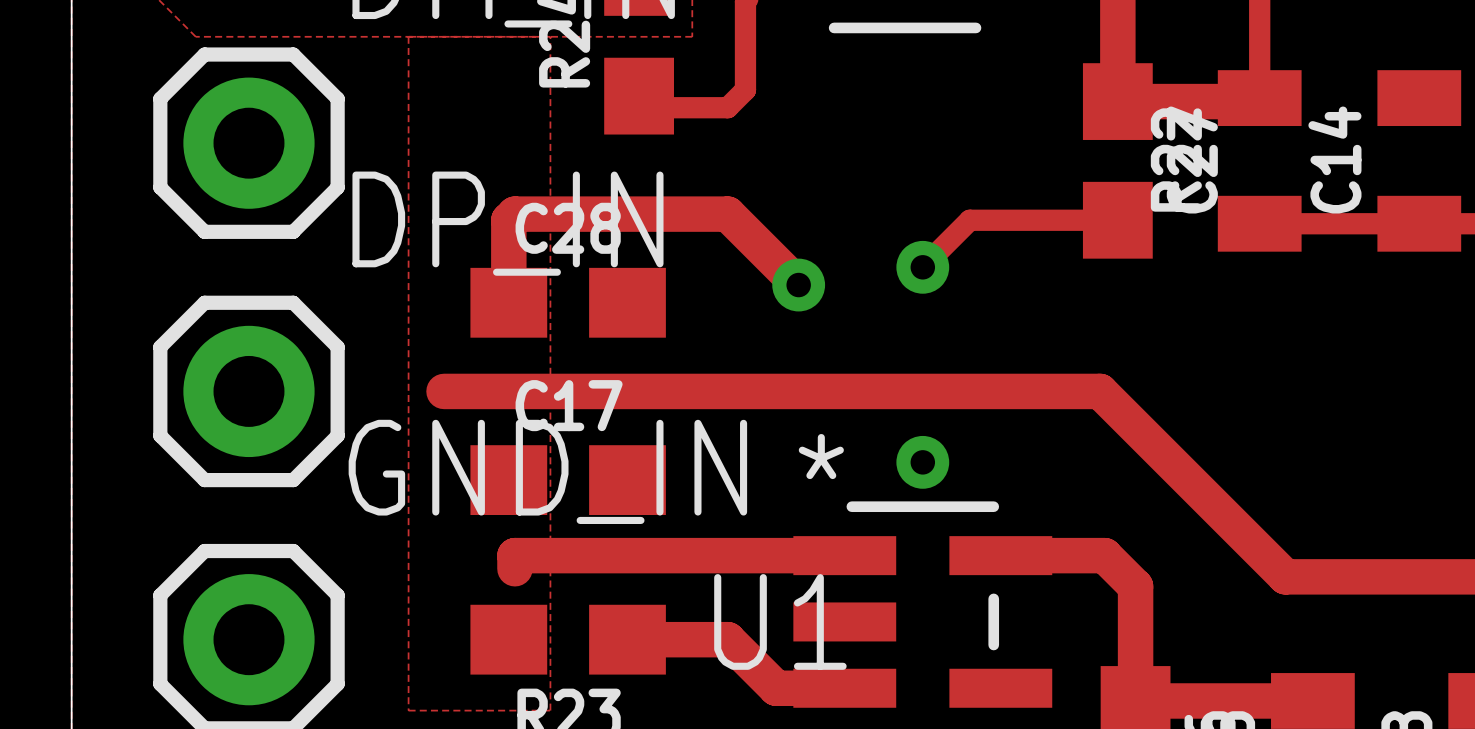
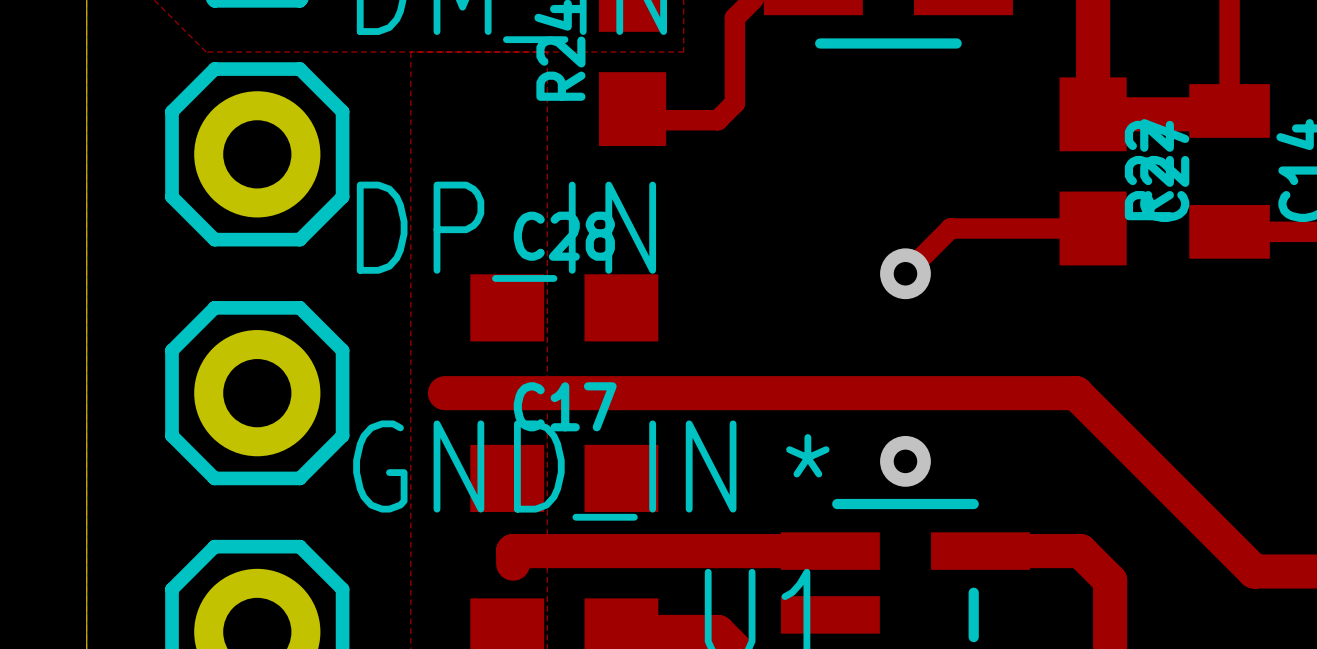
track: (798, 285) (727, 214) (514, 214) (508, 220) (508, 302) -> none
via: (798, 285) -> none

